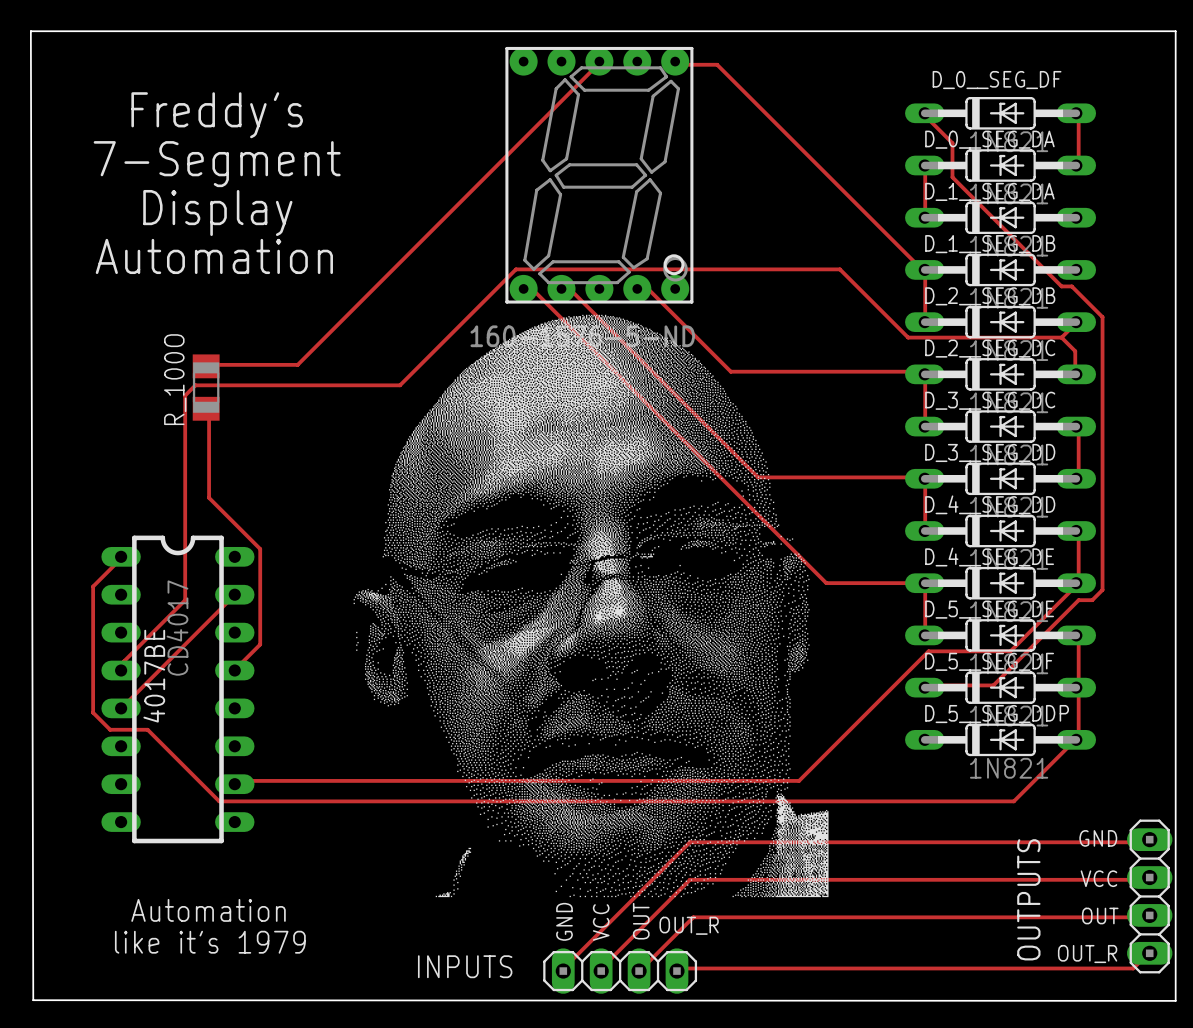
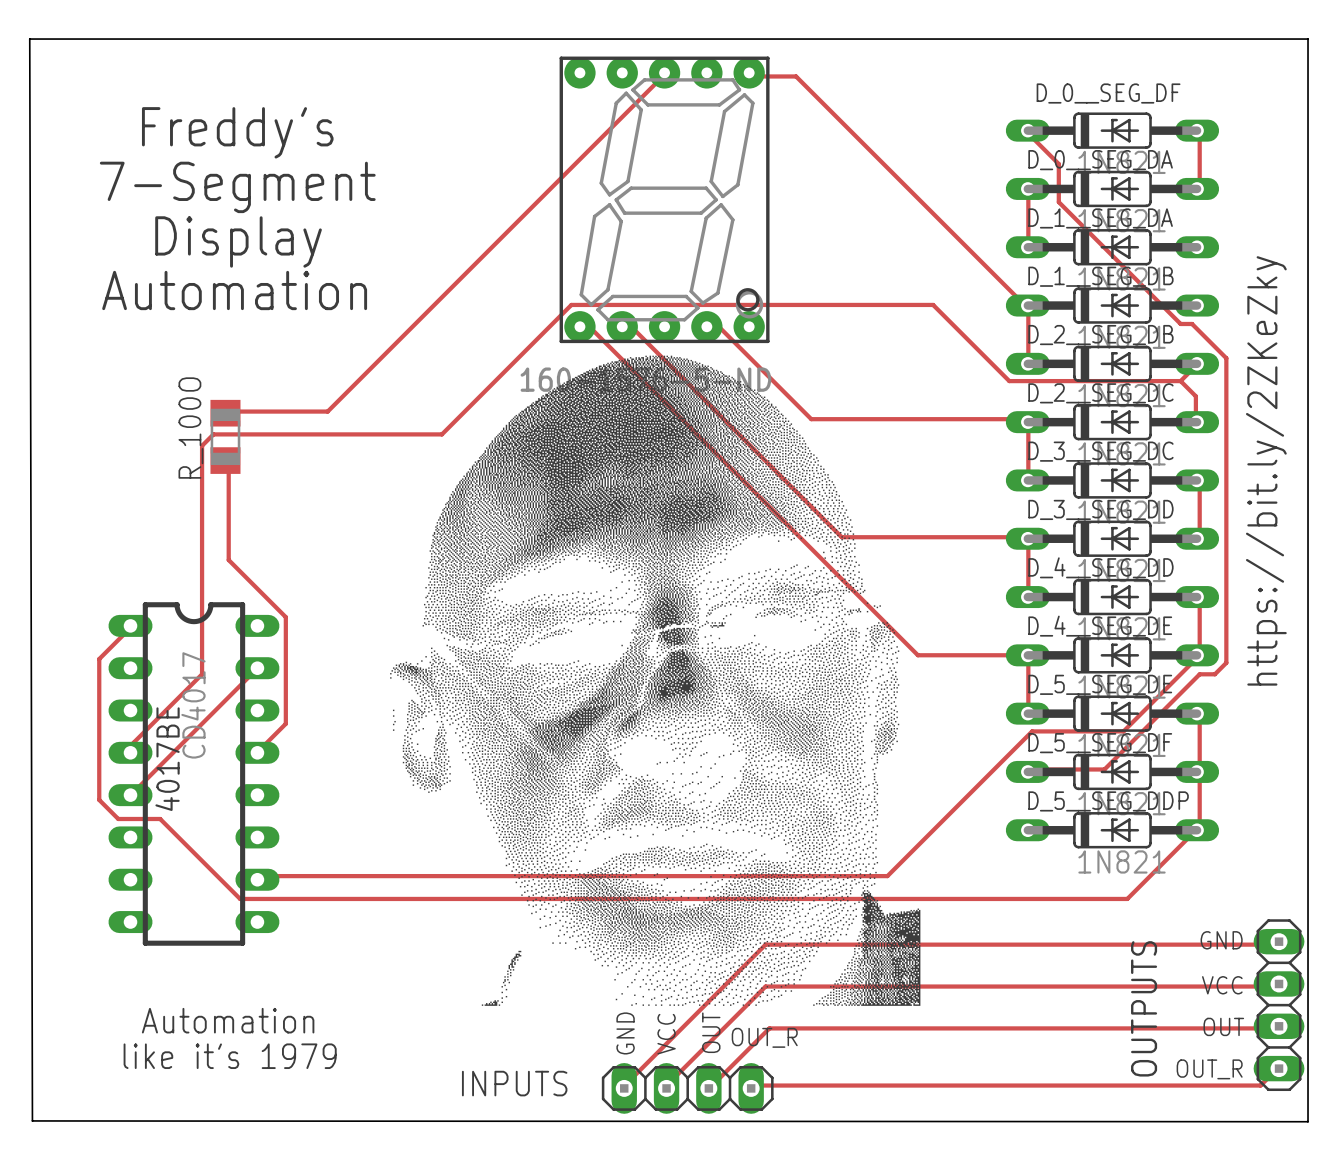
text: none -> https://bit.ly/2ZKeZky (1266, 470)

